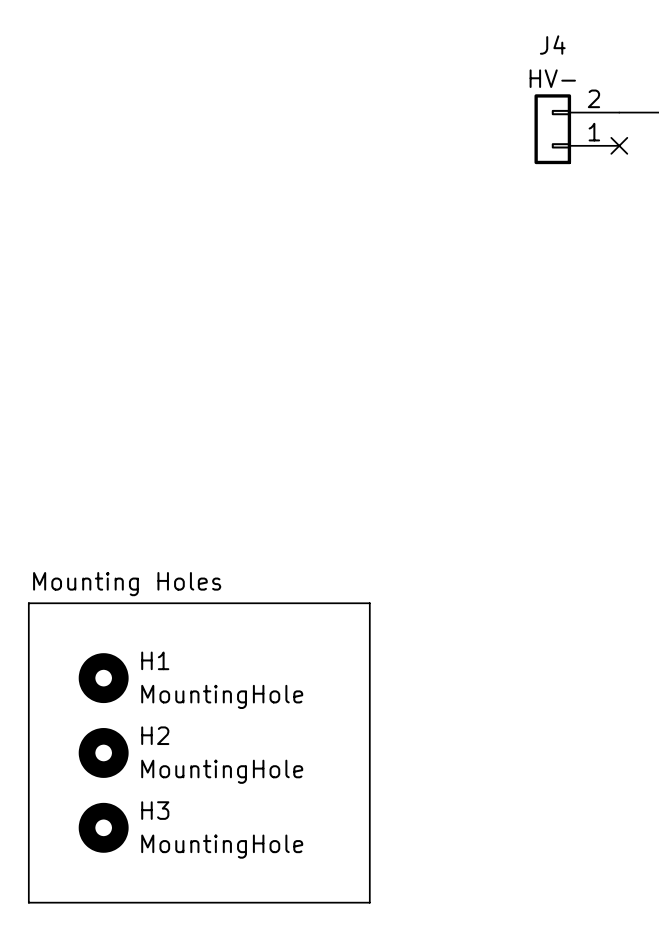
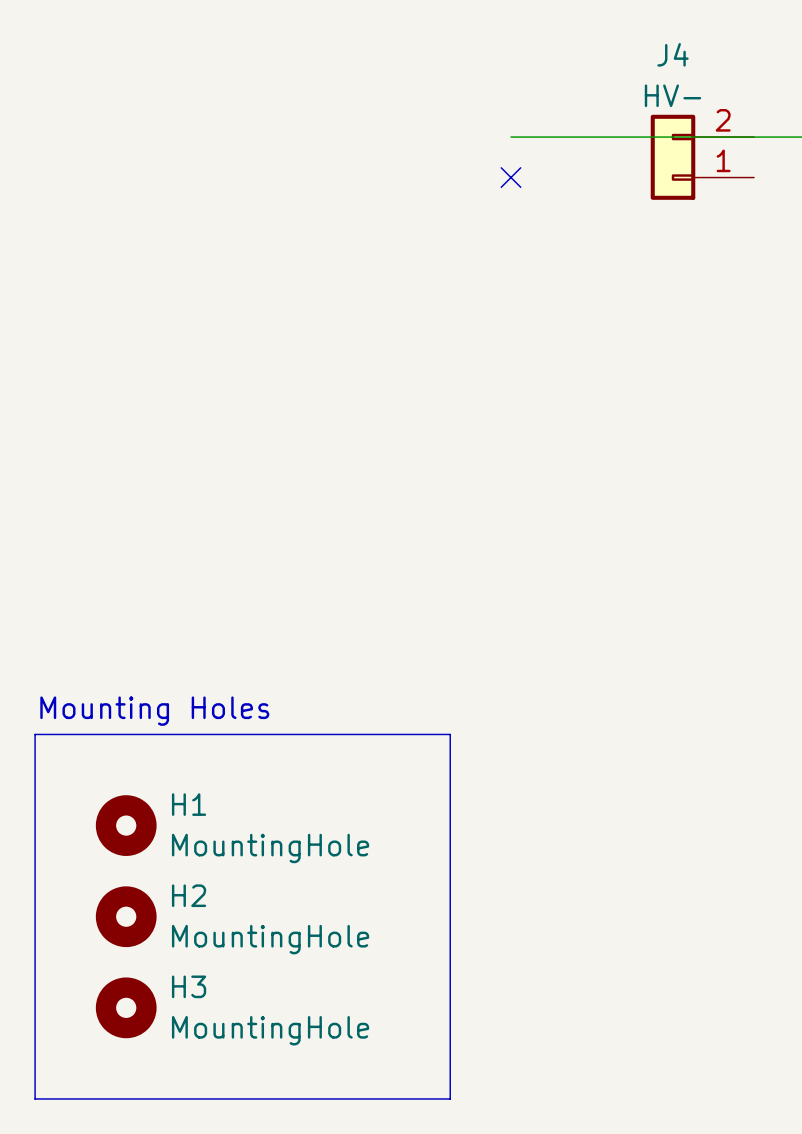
wire: none -> (510, 137) (754, 137)
no-connect mark: none -> (510, 177)
no-connect mark: (619, 145) -> none

